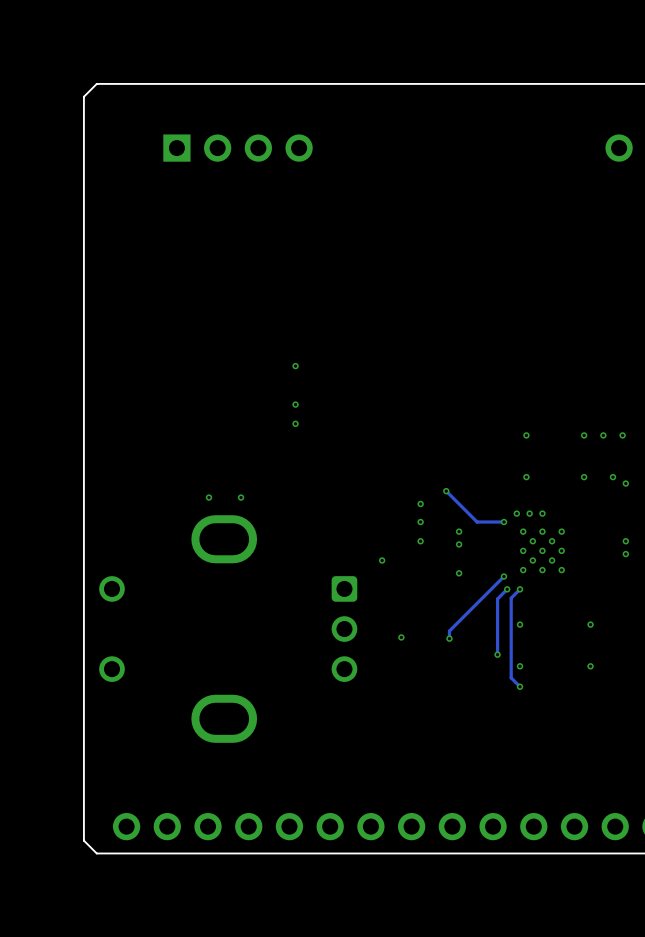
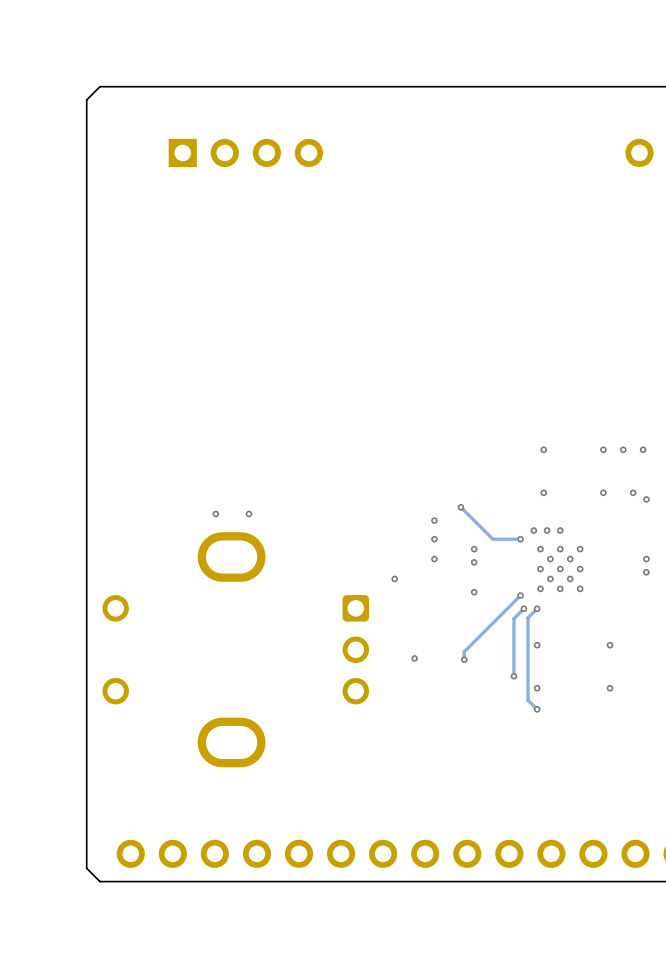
via: (295, 366) -> none
via: (295, 404) -> none
via: (295, 423) -> none

